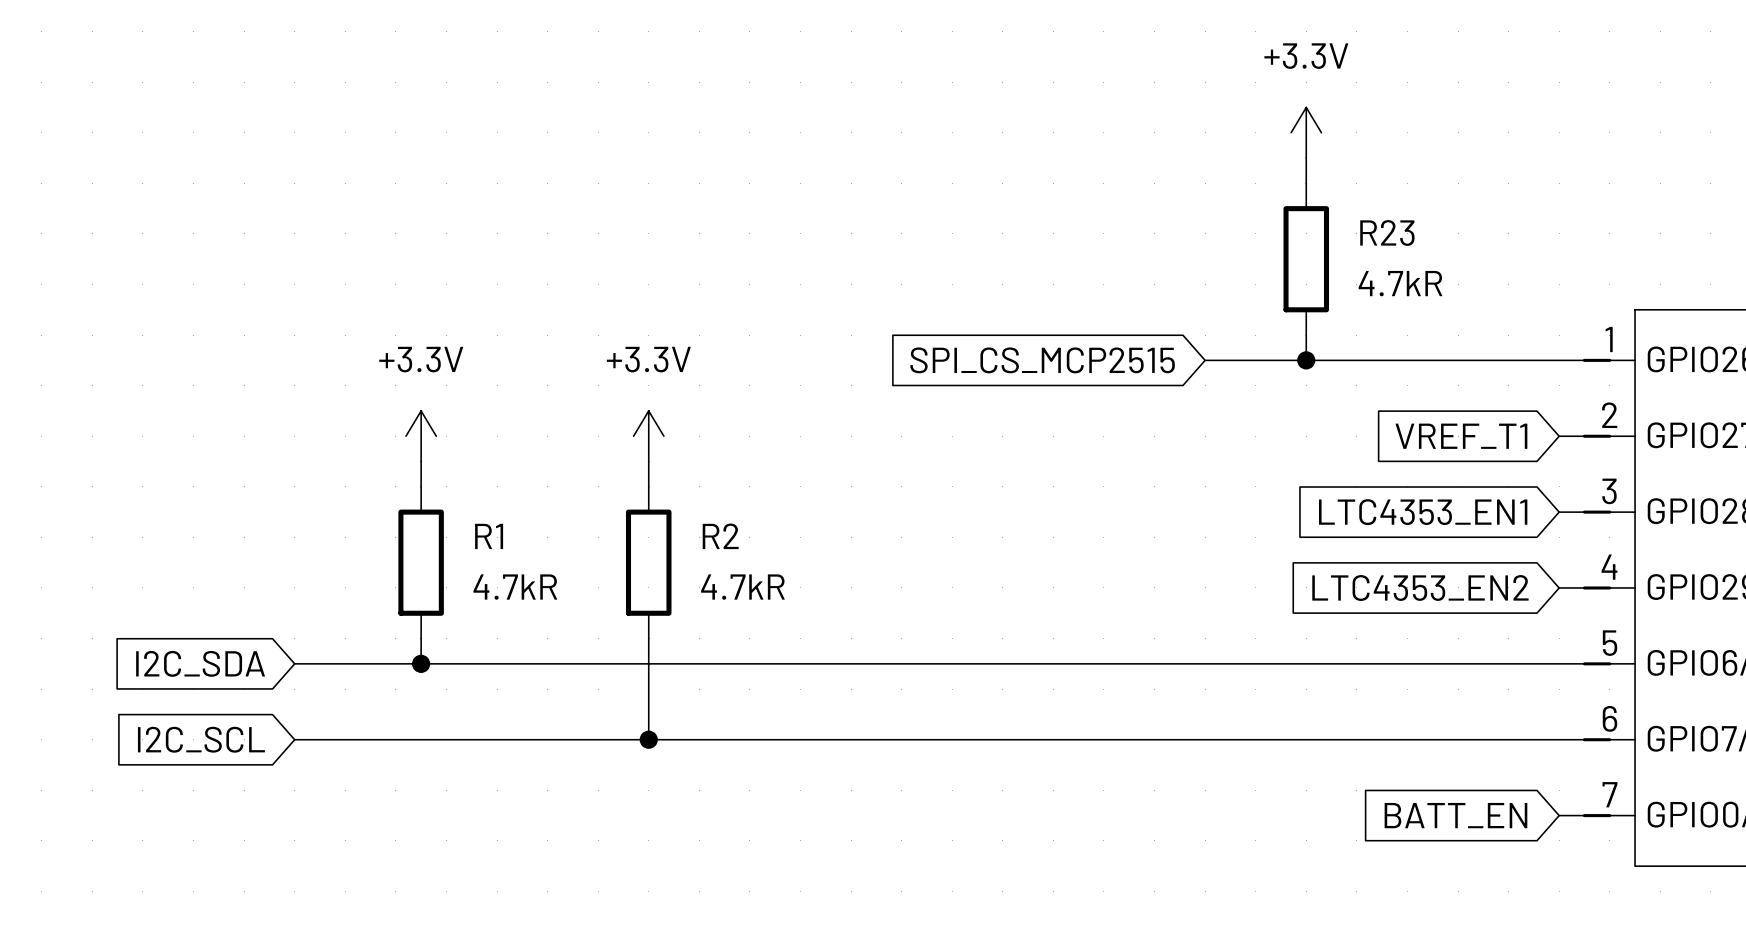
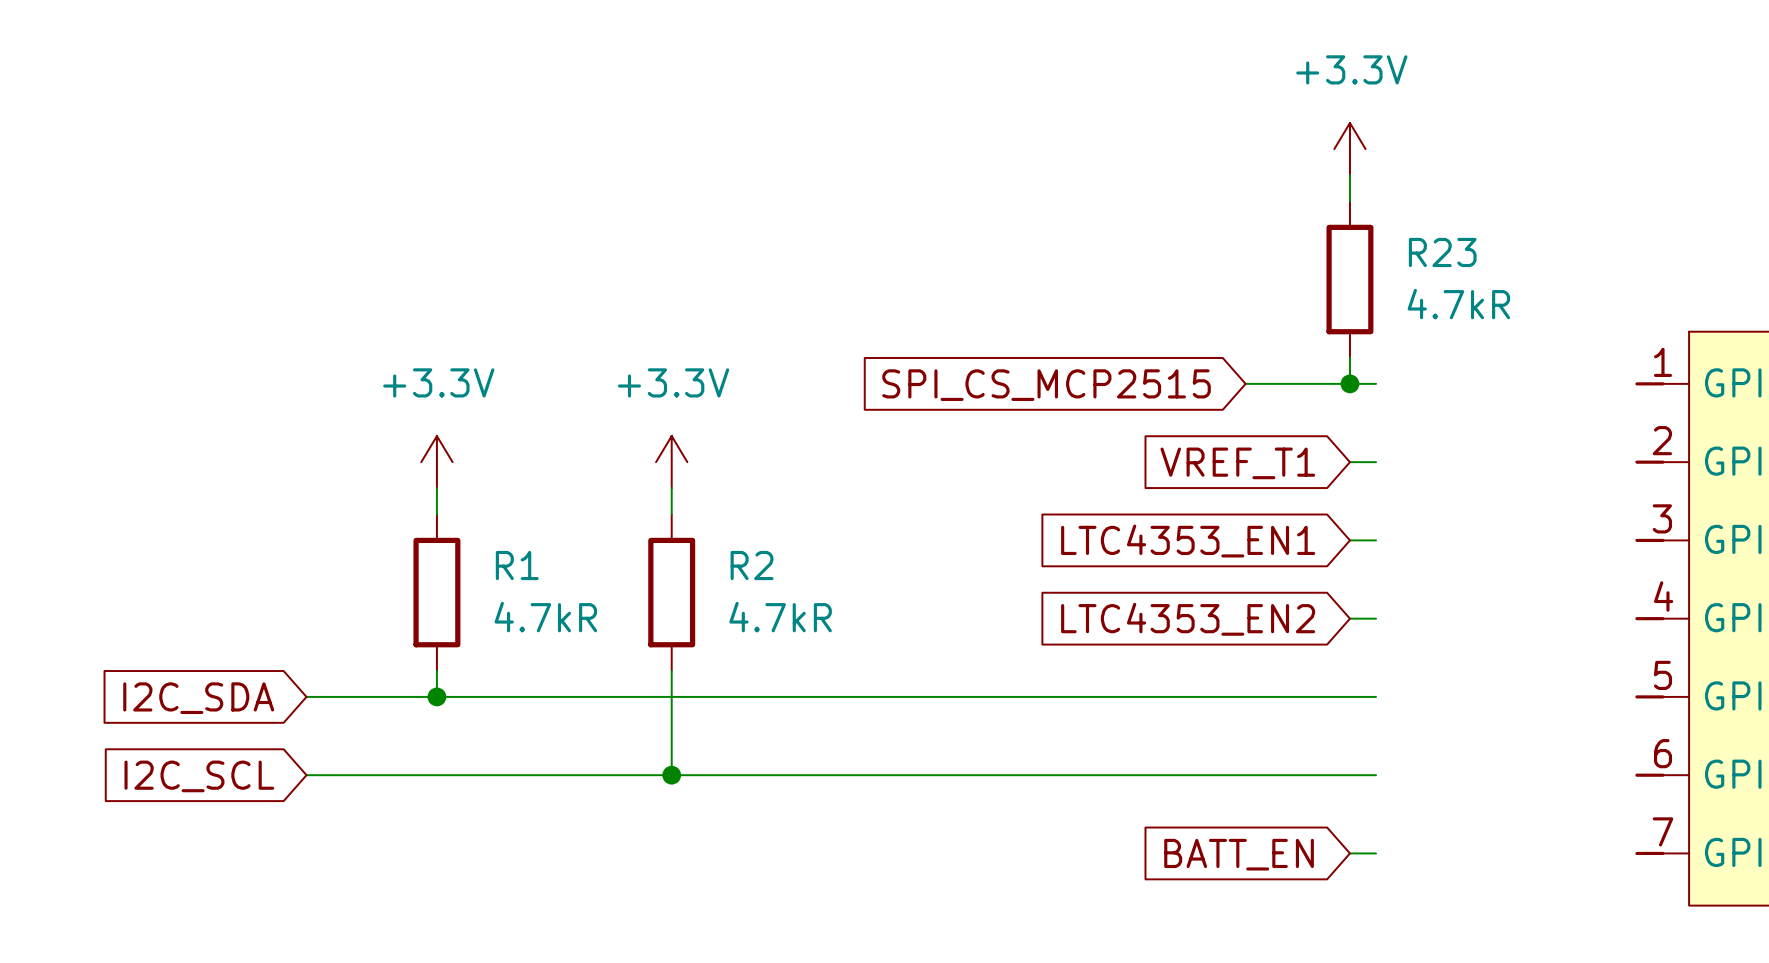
wire: (1331, 360) (1584, 360) -> none
global label position: VREF_T1 (1461, 436) -> VREF_T1 (1237, 463)
wire: (1559, 436) (1584, 436) -> (1349, 462) (1376, 462)
global label position: LTC4353_EN1 (1423, 512) -> LTC4353_EN1 (1188, 541)
wire: (1559, 512) (1584, 512) -> (1349, 540) (1376, 540)
wire: (1559, 587) (1584, 587) -> (1349, 618) (1376, 618)
global label position: LTC4353_EN2 (1420, 588) -> LTC4353_EN2 (1188, 619)
wire: (1331, 663) (1584, 663) -> none
wire: (1331, 739) (1584, 739) -> none
global label position: BATT_EN (1455, 815) -> BATT_EN (1239, 854)
wire: (1559, 815) (1584, 815) -> (1349, 853) (1376, 853)

